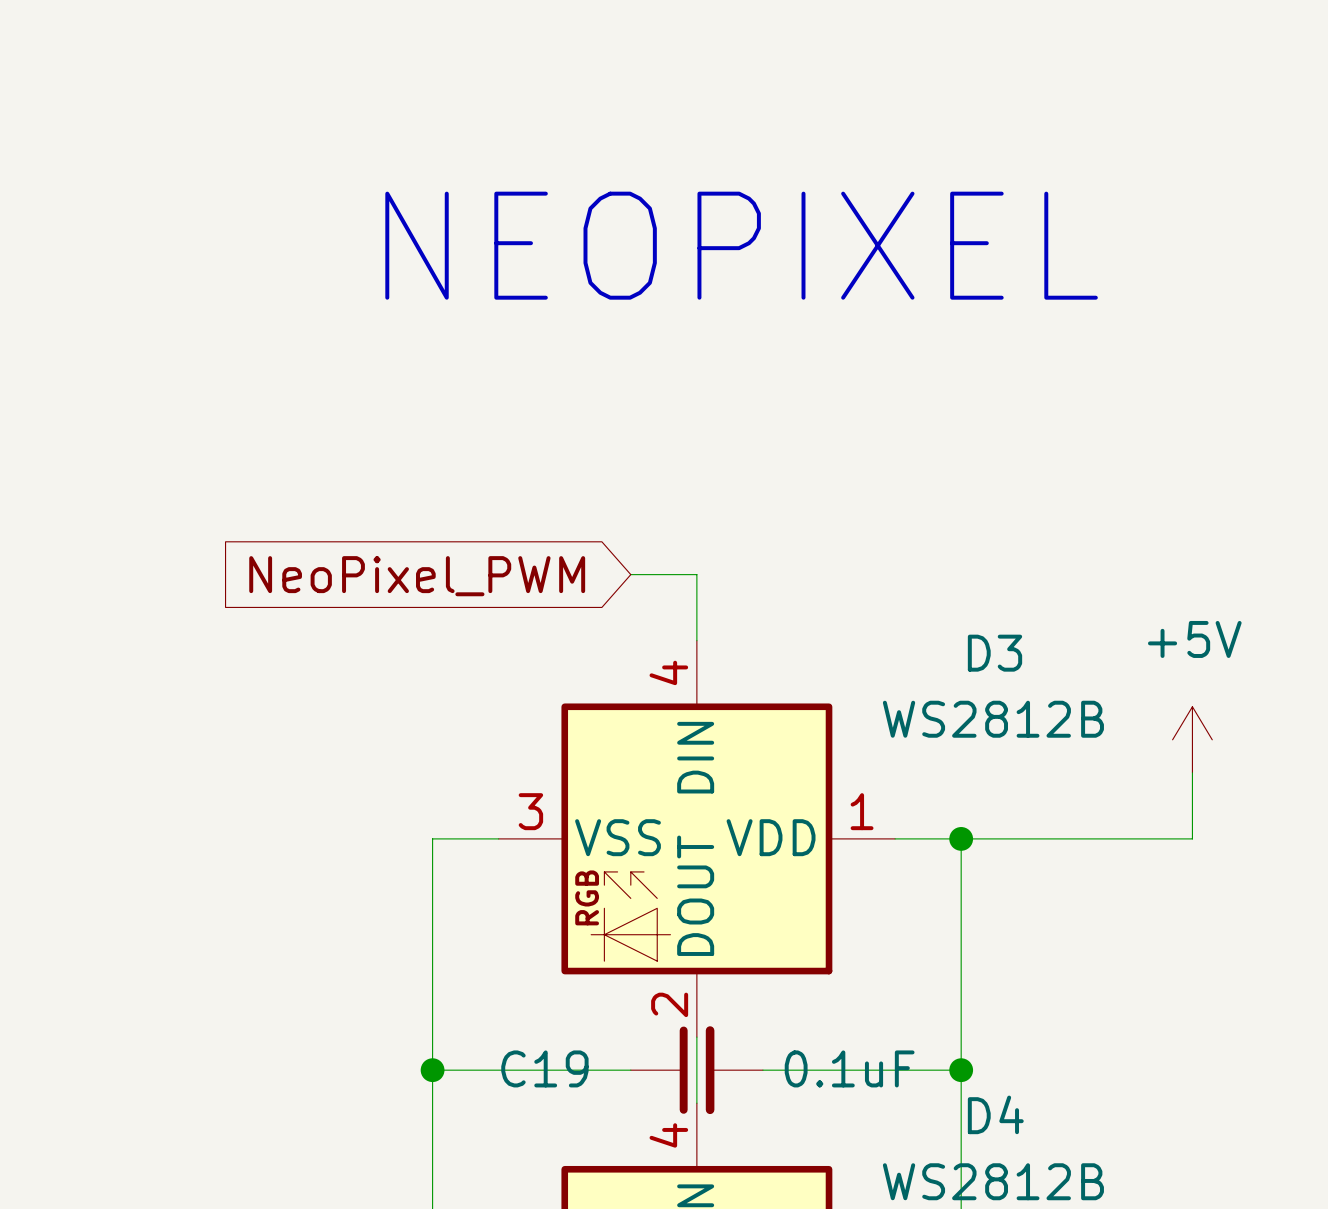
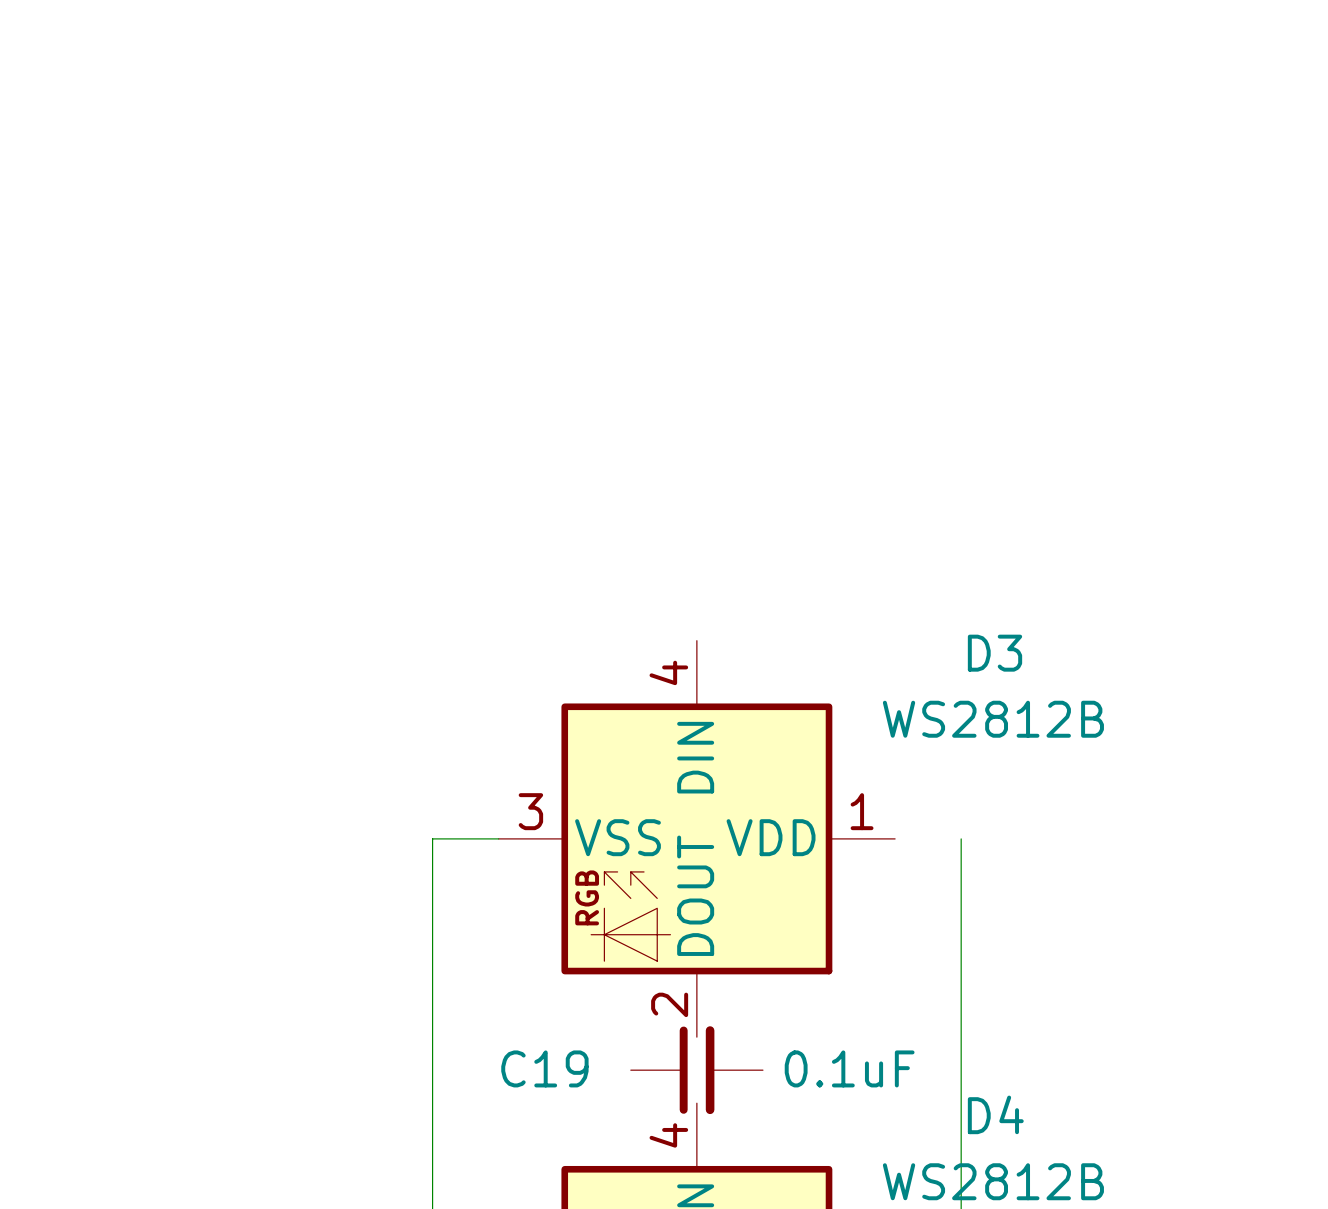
text: NEOPIXEL (741, 245) -> none
wire: (630, 574) (696, 574) (696, 640) -> none
global label: NeoPixel_PWM (417, 576) -> none
power symbol: +5V (1192, 739) -> none
wire: (1192, 772) (1192, 838) (895, 838) -> none
junction: (961, 838) -> none
wire: (696, 1037) (696, 1103) -> none
wire: (432, 1070) (630, 1070) -> none
junction: (432, 1070) -> none
wire: (762, 1070) (961, 1070) -> none
junction: (961, 1070) -> none

